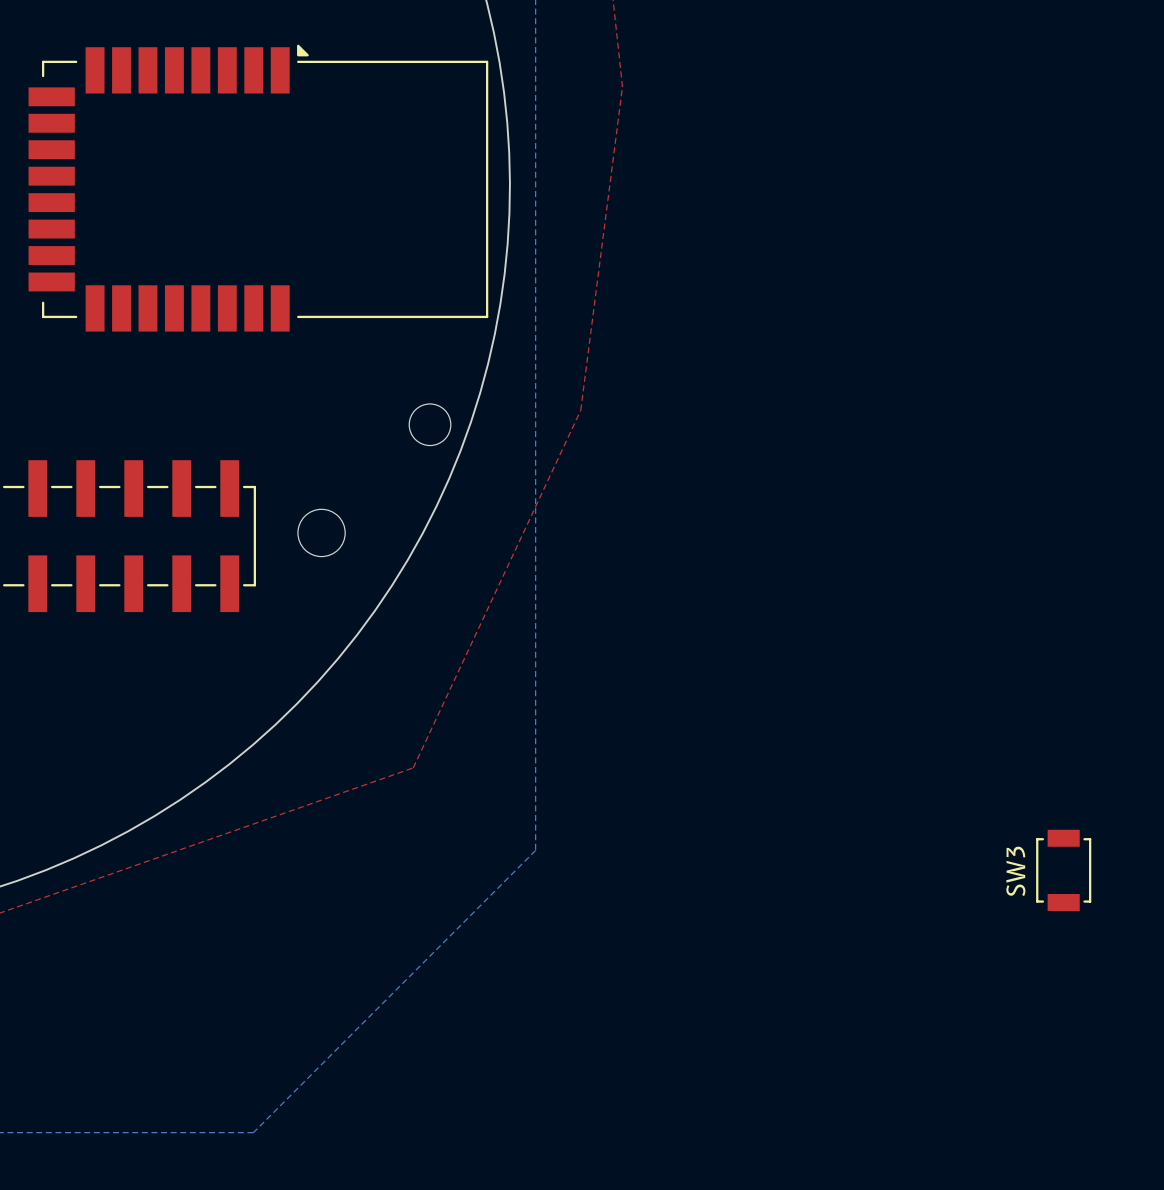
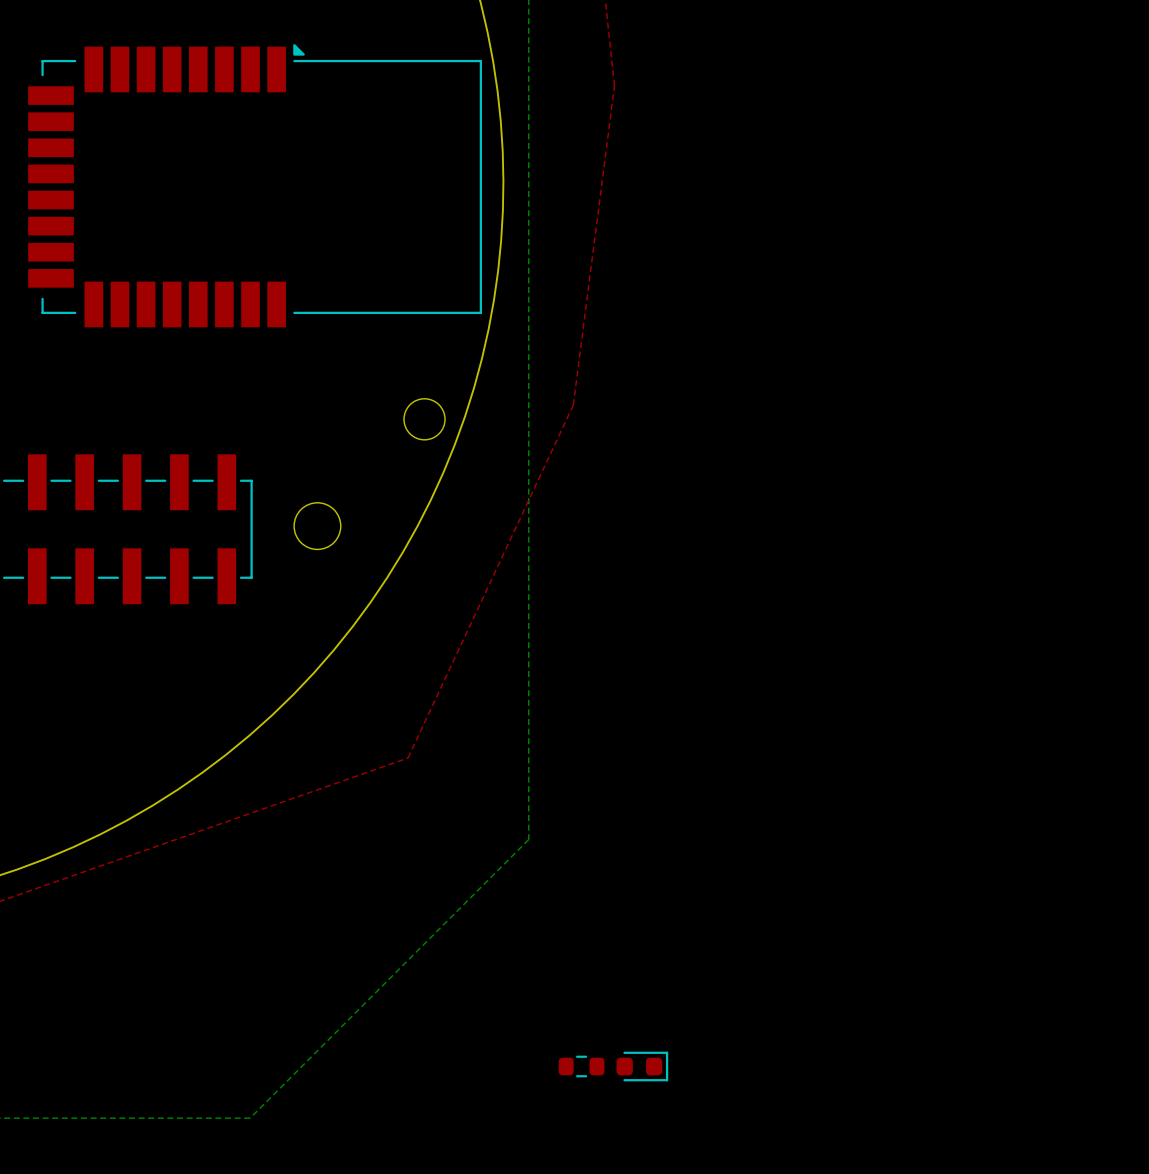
SW3: (1063, 870) -> none
part: none -> (581, 1066)
part: none -> (642, 1066)

